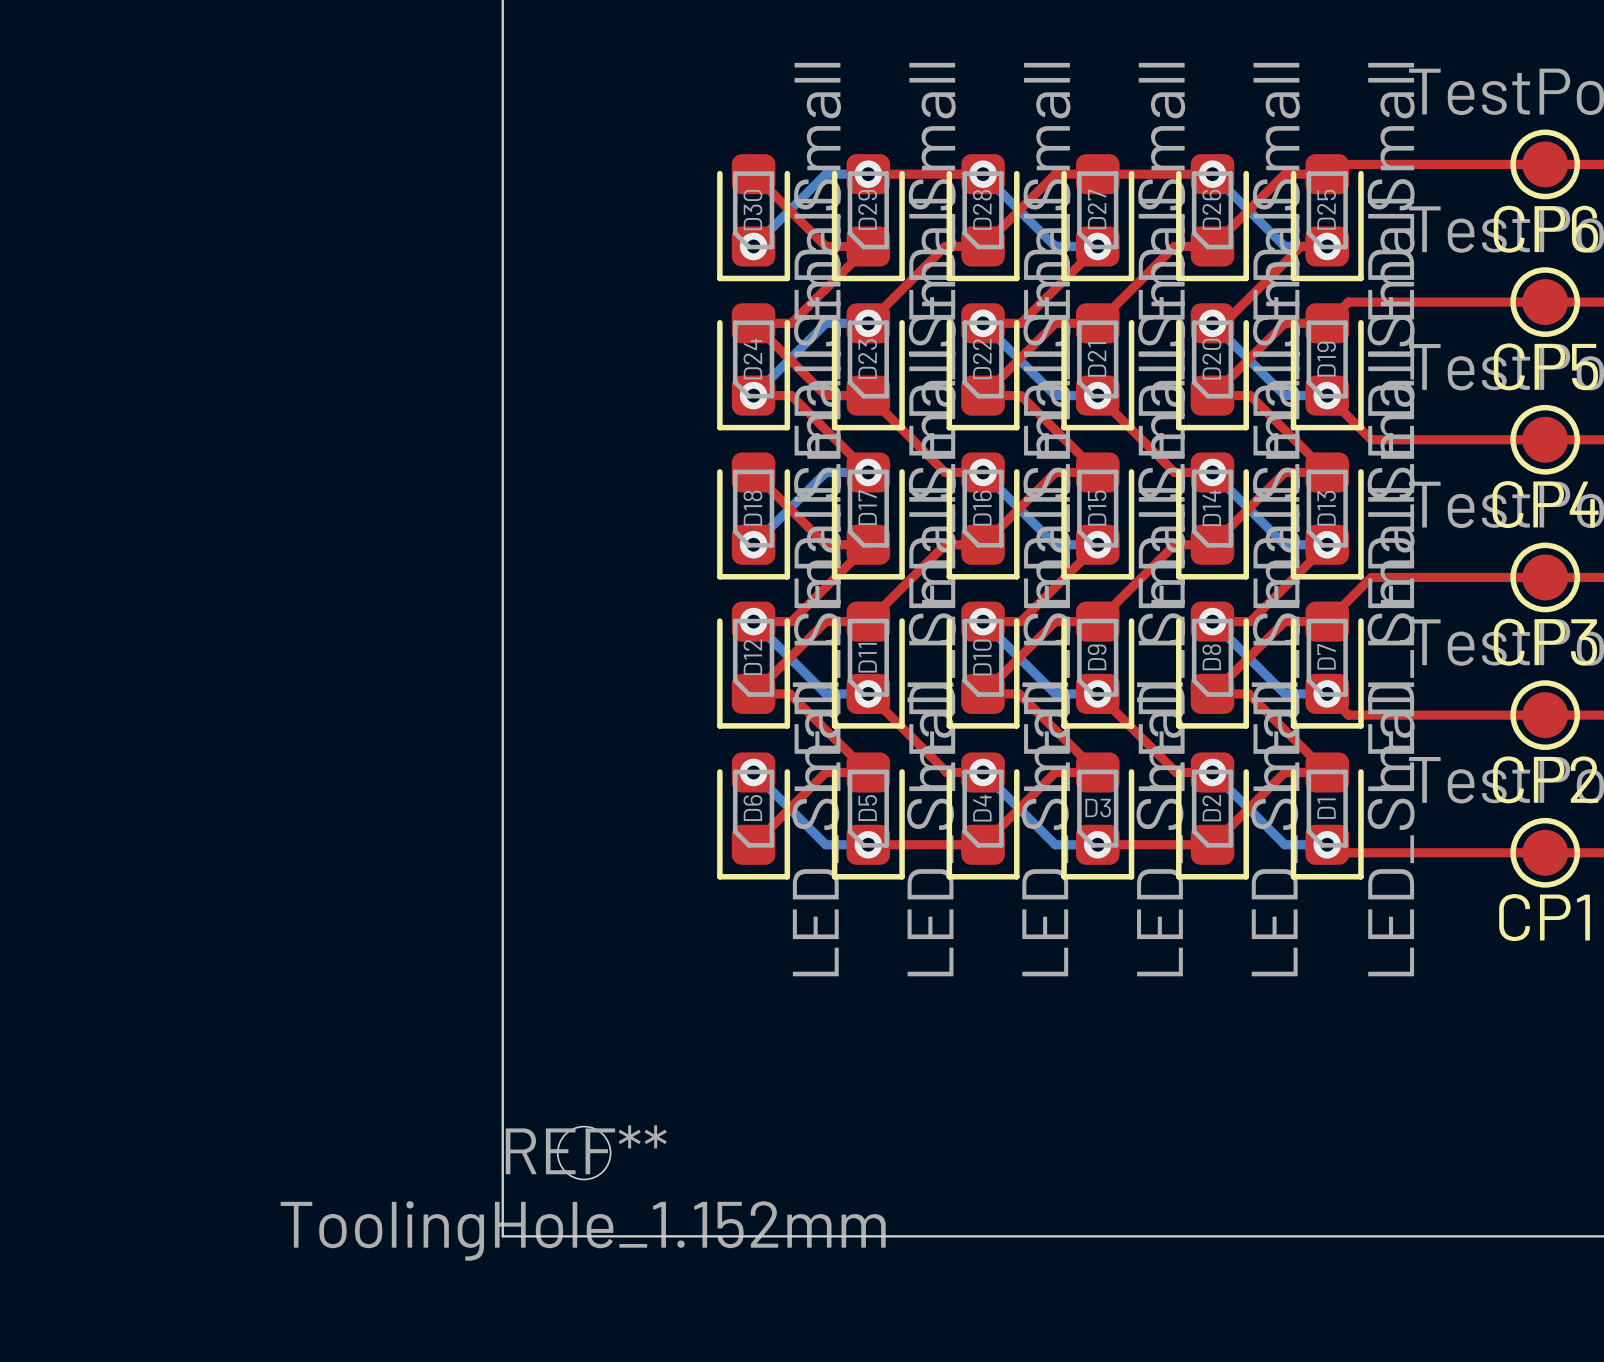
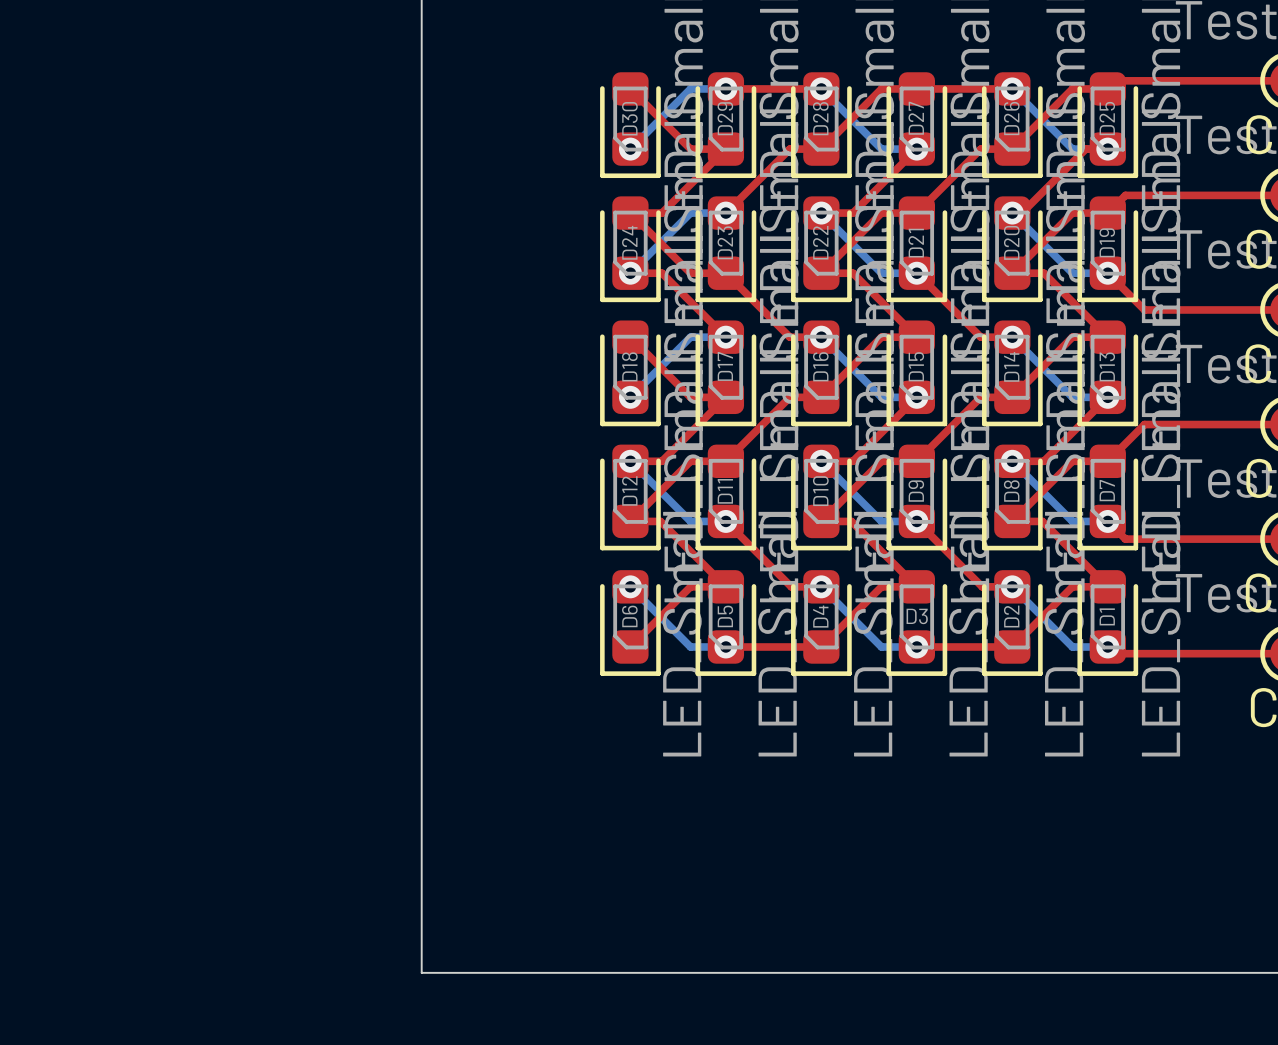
REF**: ToolingHole_1.152mm (584, 1153) -> none

